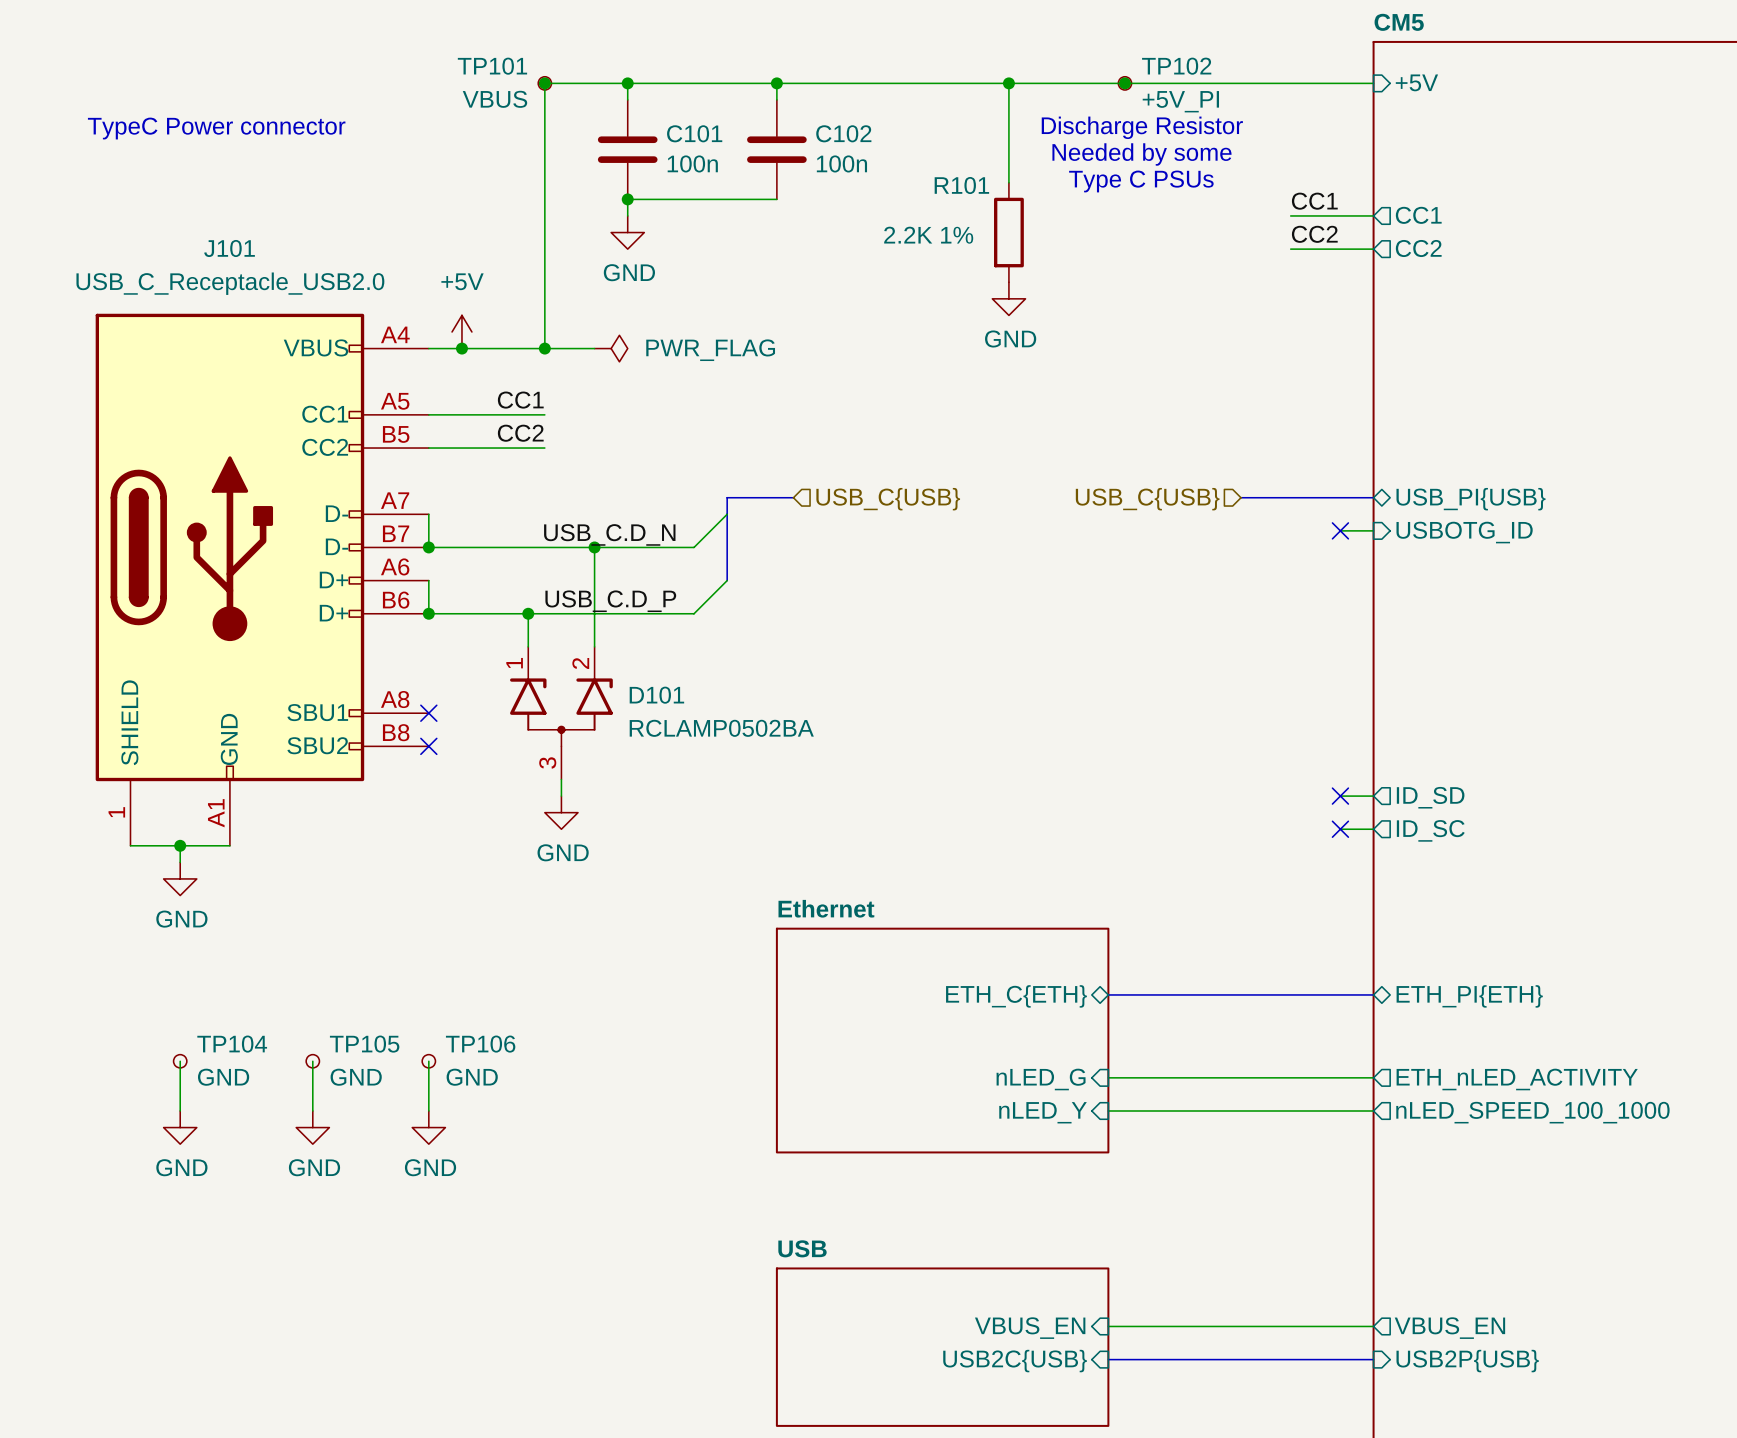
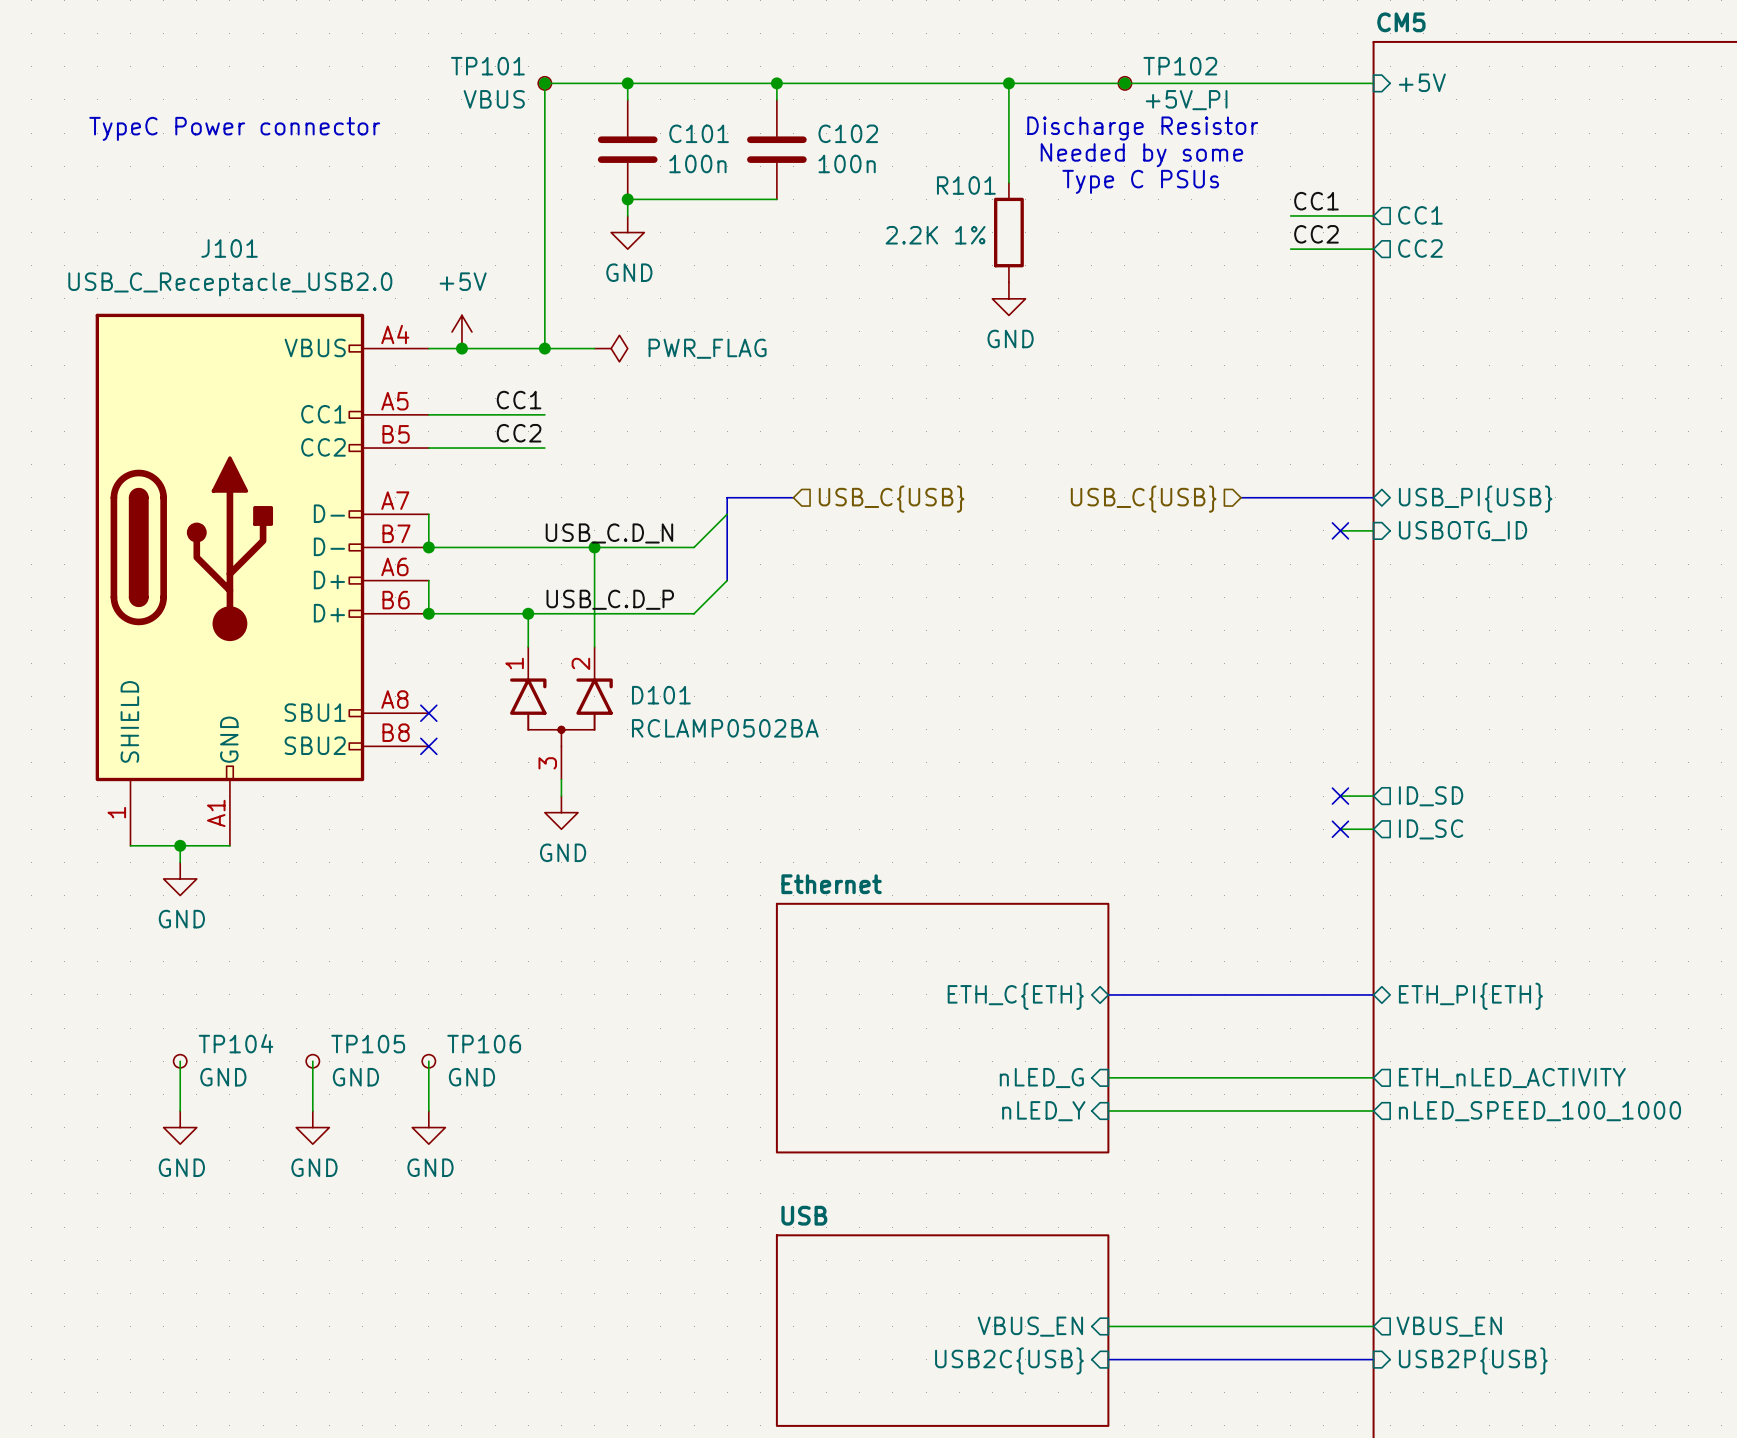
sheet Ethernet shape: [775, 927, 1110, 1154] -> [775, 902, 1110, 1154]
sheet USB: none -> (942, 1330)
sheet USB: (942, 1347) -> none

